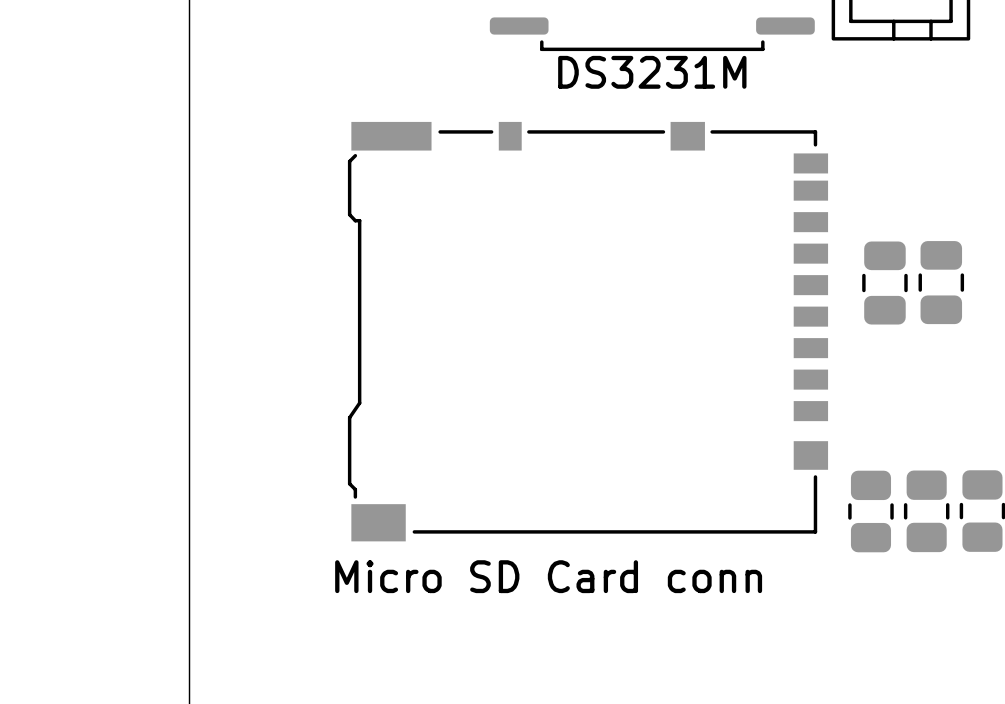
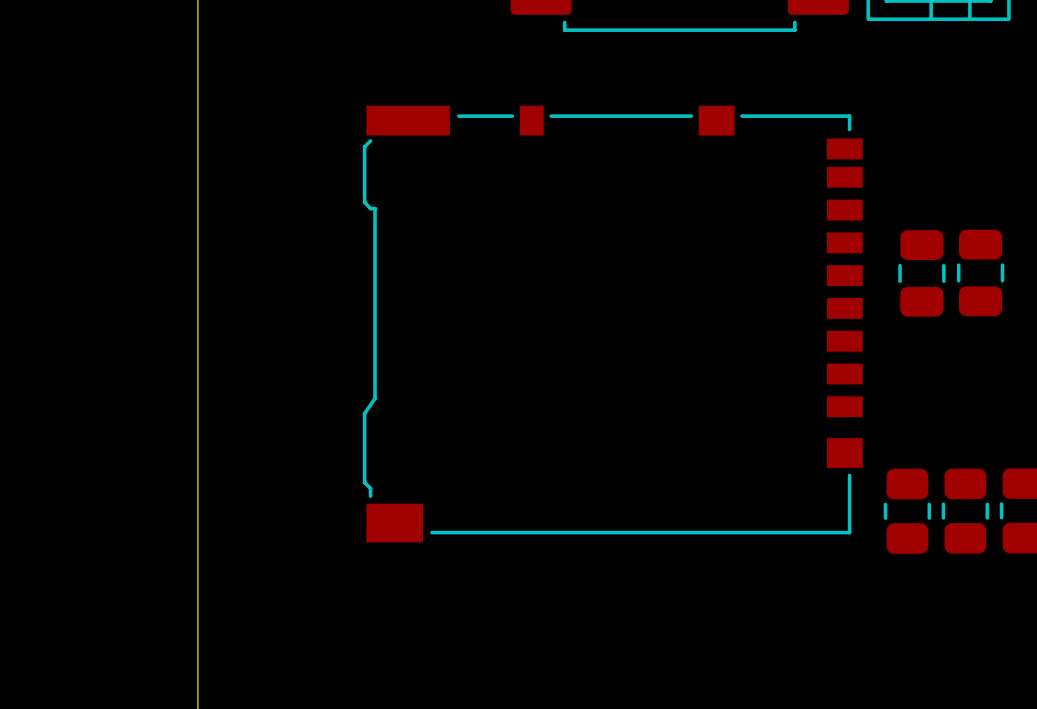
part value: DS3231M (652, 72) -> none
text: Micro SD Card conn (548, 576) -> none

